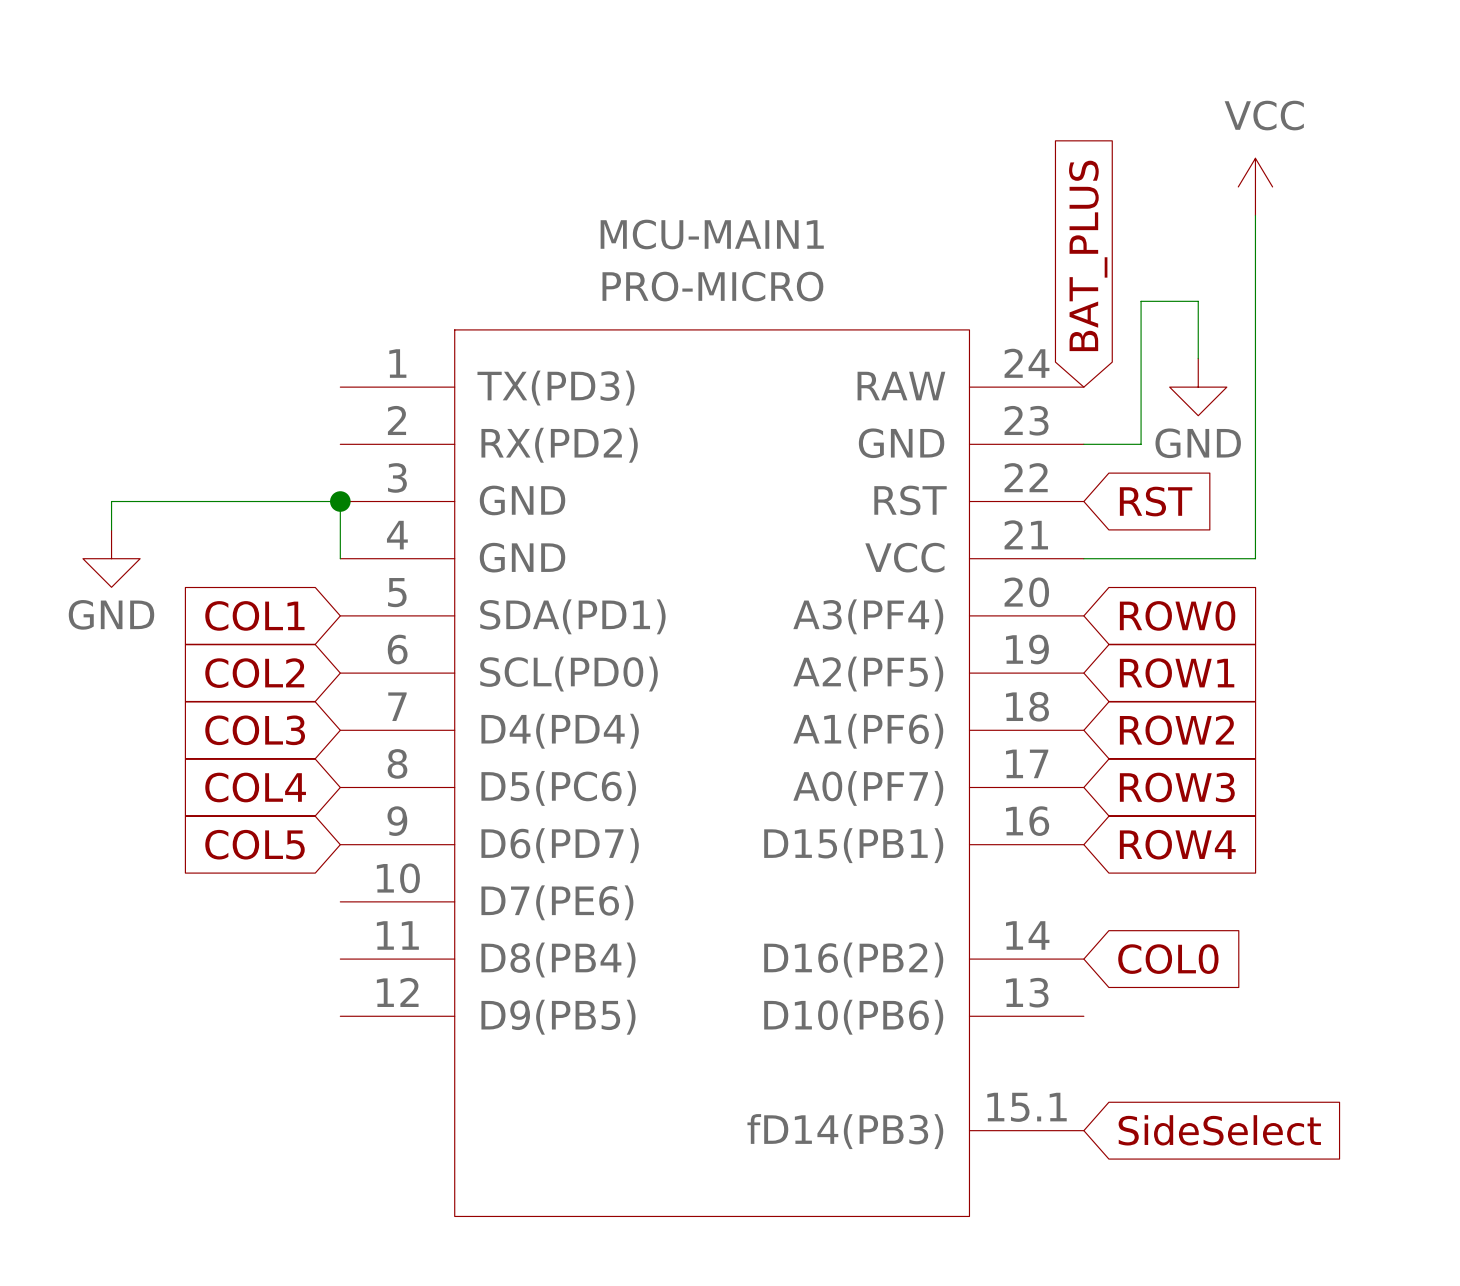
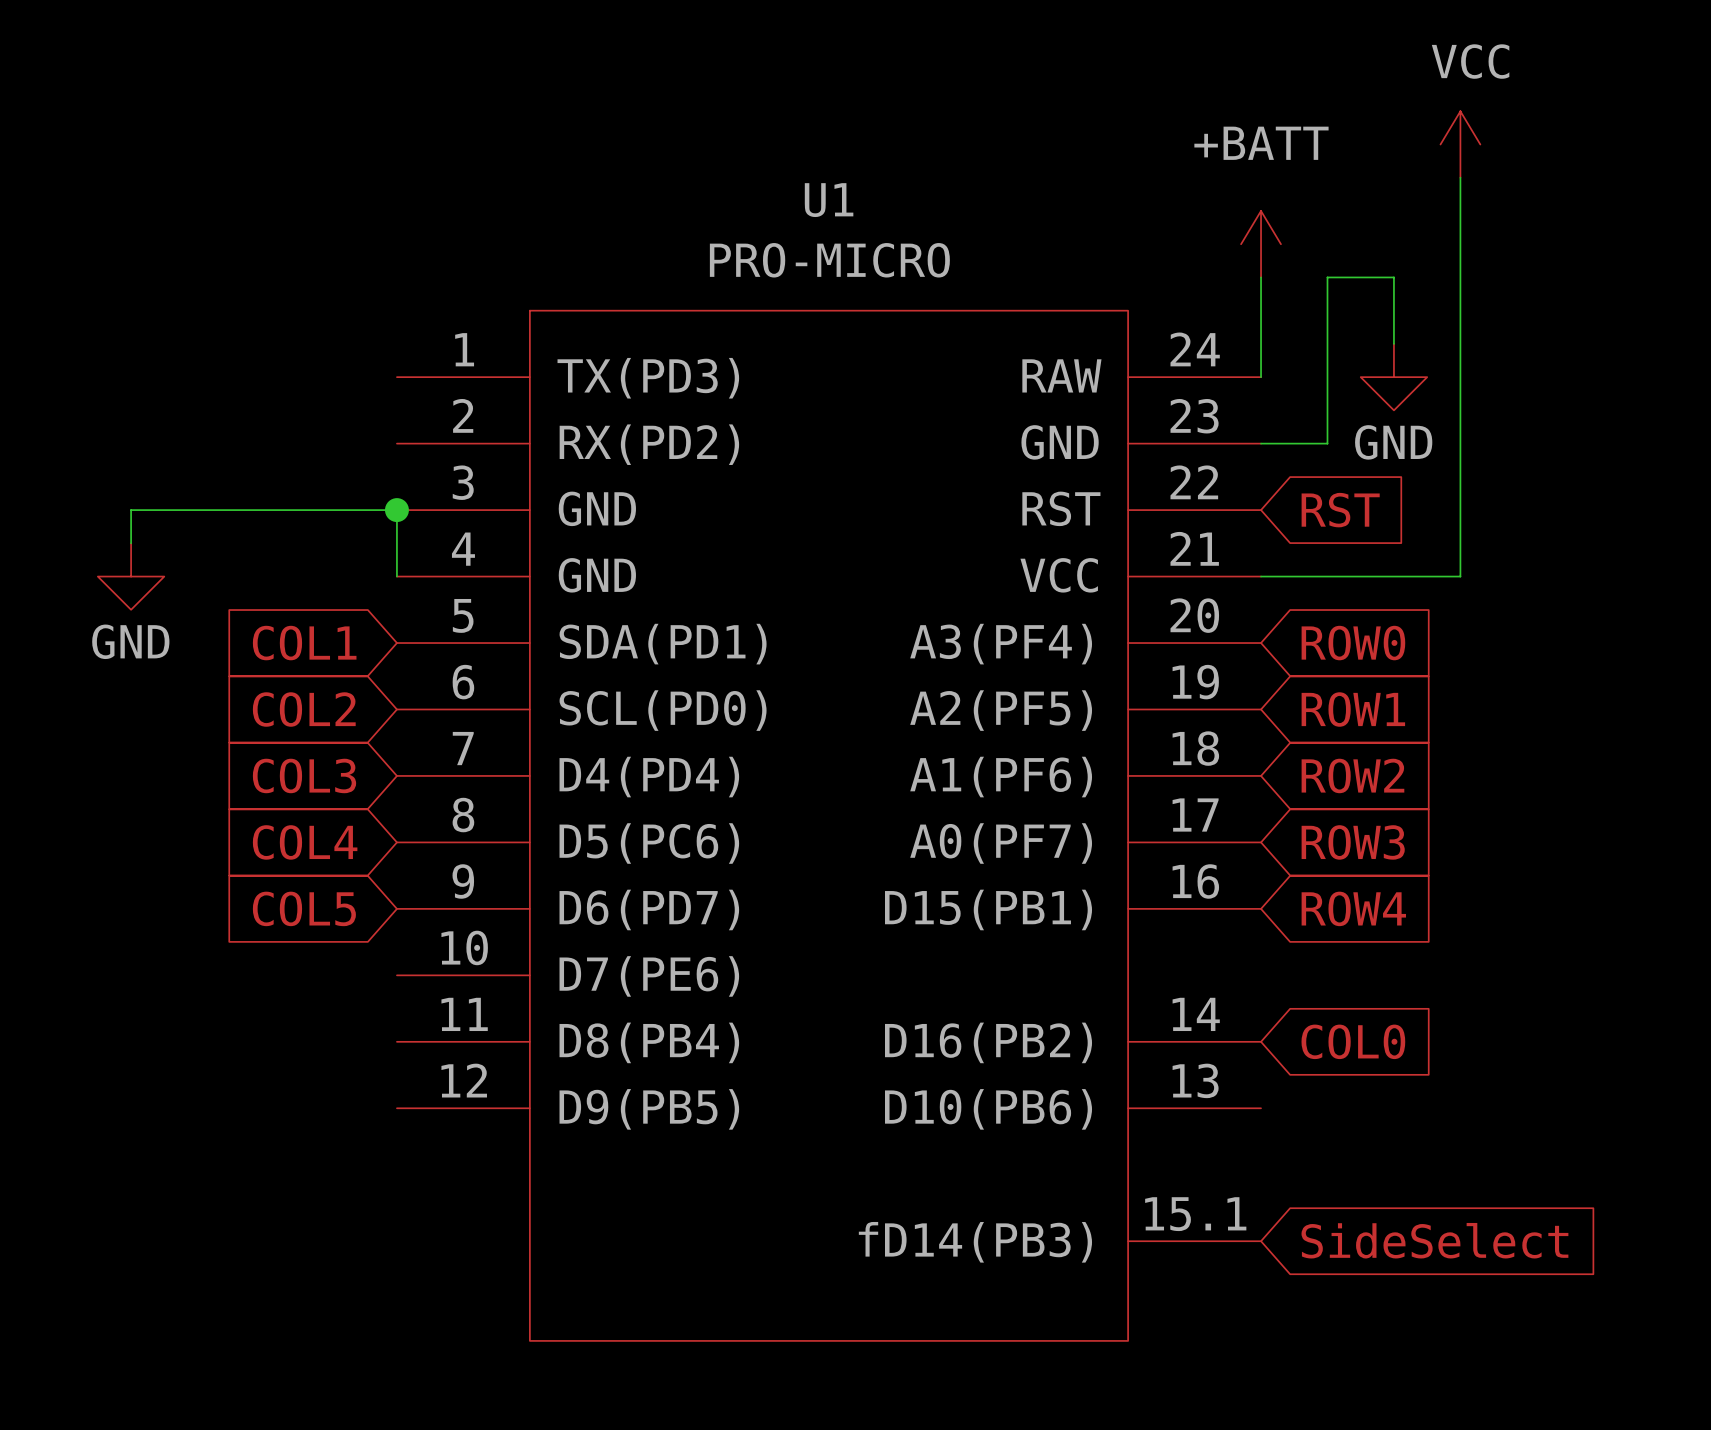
MCU-MAIN1 name: MCU-MAIN1 (712, 234) -> U1 (829, 200)
global label: BAT_PLUS (1088, 255) -> none
power symbol: none -> +BATT (1261, 244)
wire: none -> (1261, 277) (1261, 377)

